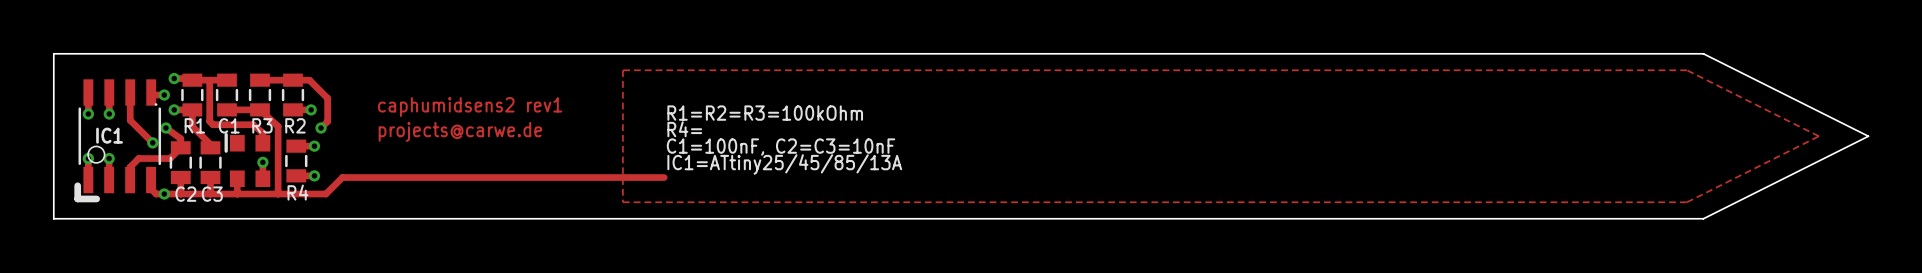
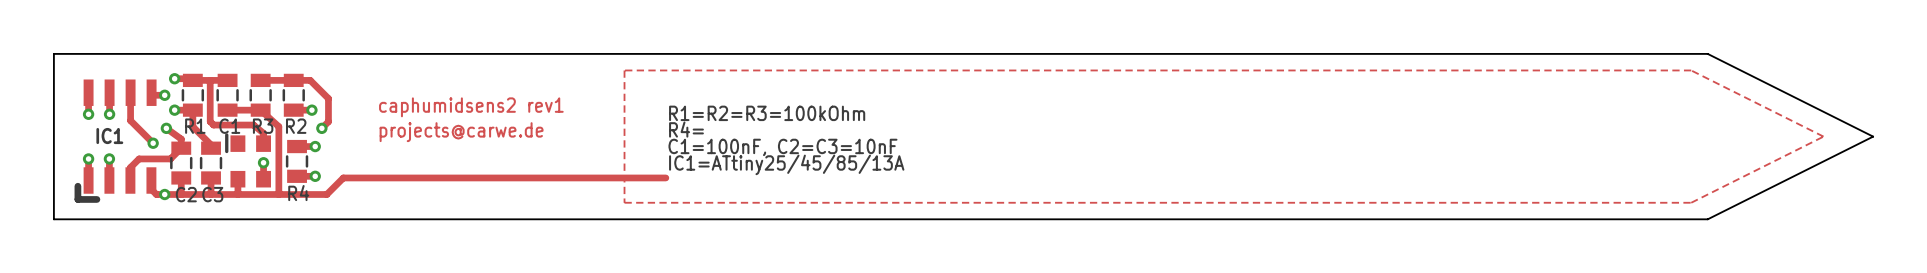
IC1 footprint: [78, 79, 162, 194] -> [83, 79, 157, 194]

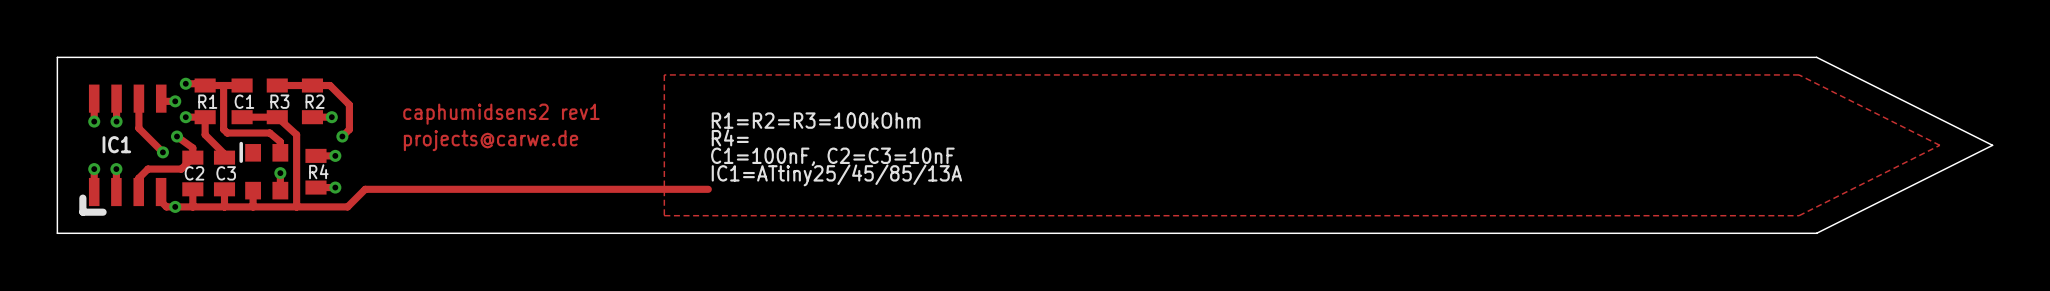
R1 footprint: [181, 73, 205, 117] -> [194, 78, 216, 125]
C1 footprint: [216, 73, 239, 117] -> [231, 78, 253, 125]
R3 footprint: [249, 73, 272, 117] -> [266, 78, 288, 125]
R2 footprint: [282, 73, 305, 117] -> [301, 78, 324, 125]
R4 footprint: [285, 139, 309, 183] -> [305, 148, 327, 195]
C2 footprint: [170, 141, 193, 185] -> [182, 150, 204, 197]
C3 footprint: [199, 141, 223, 185] -> [213, 150, 236, 197]

